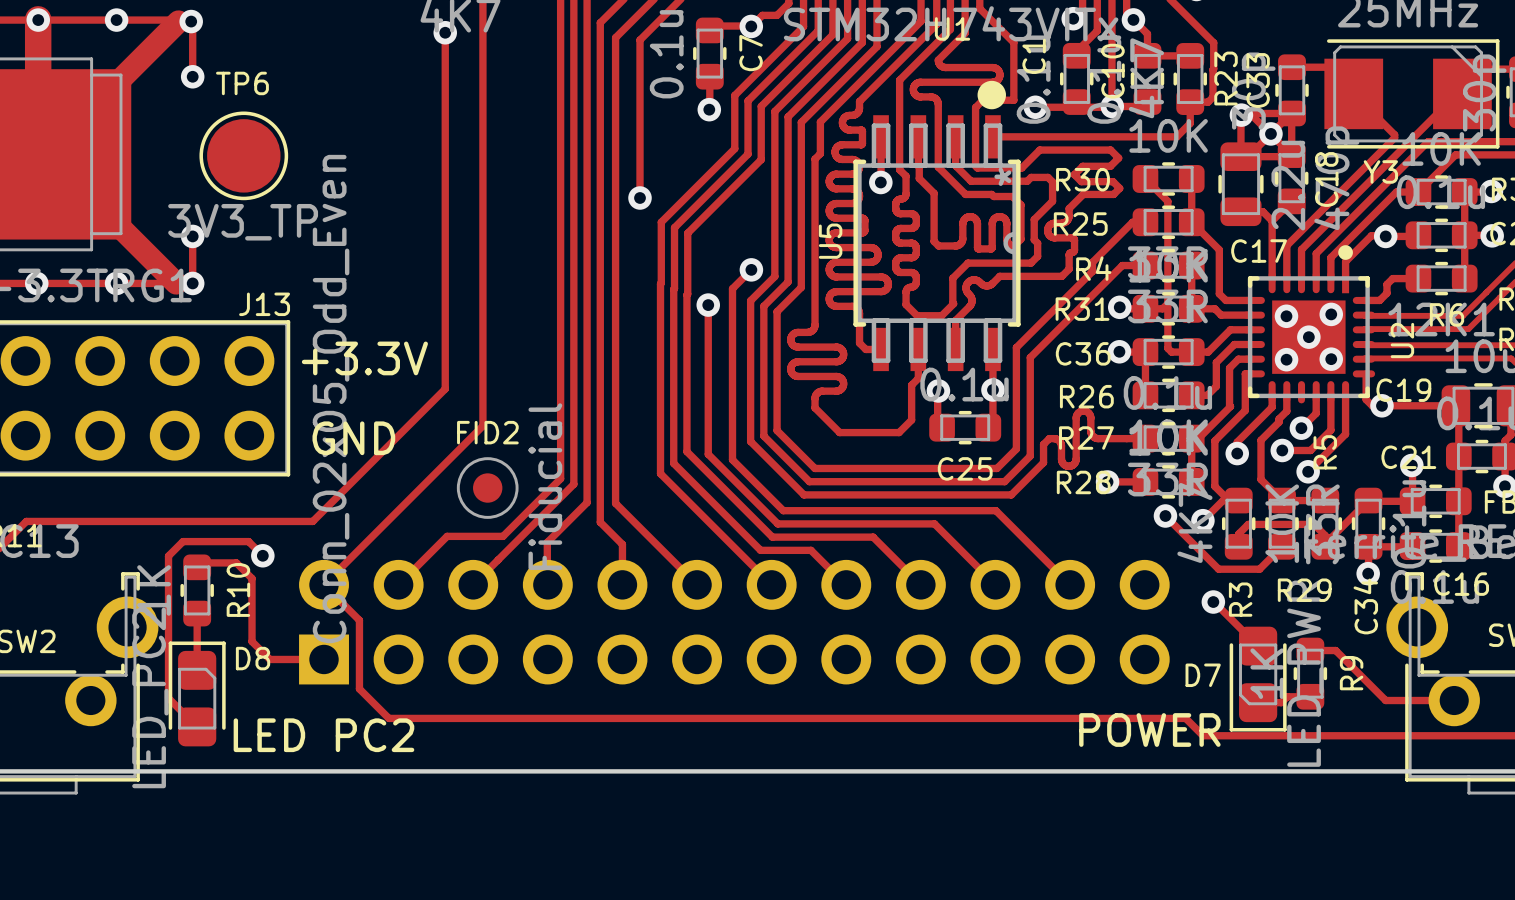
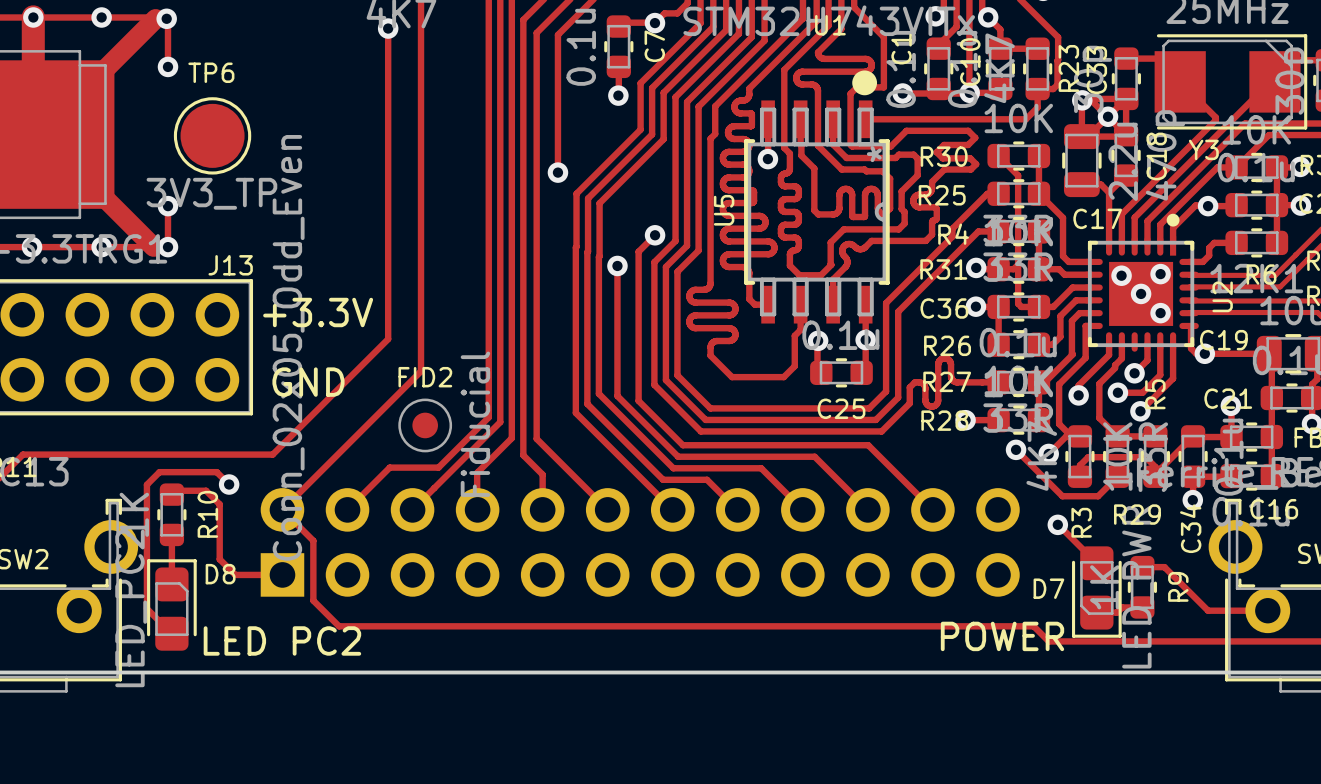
via: (1286, 359) -> none

